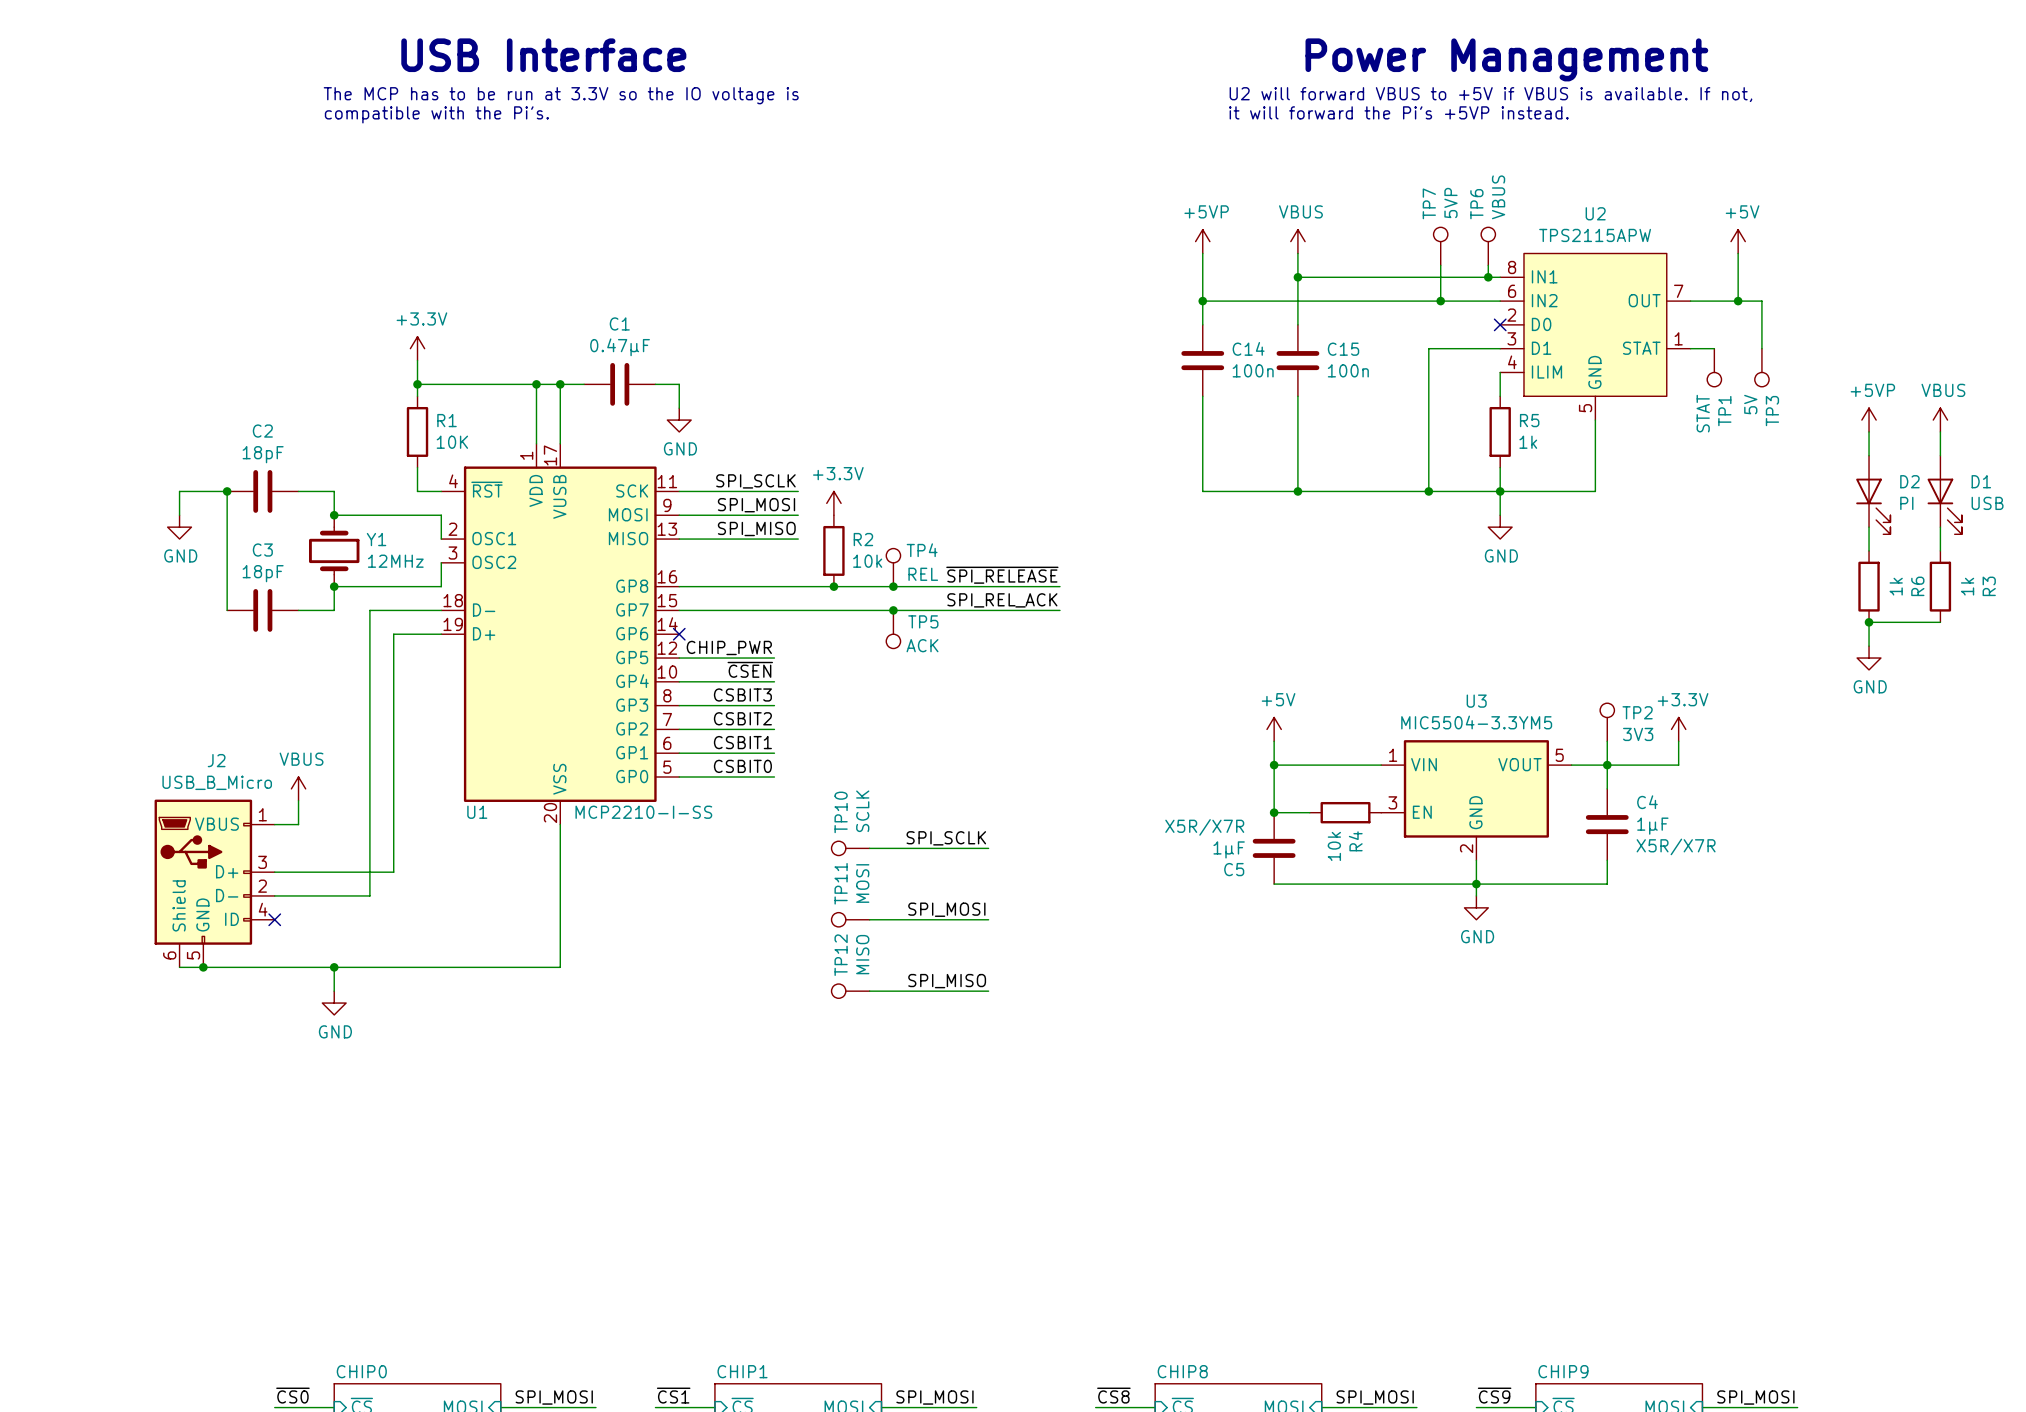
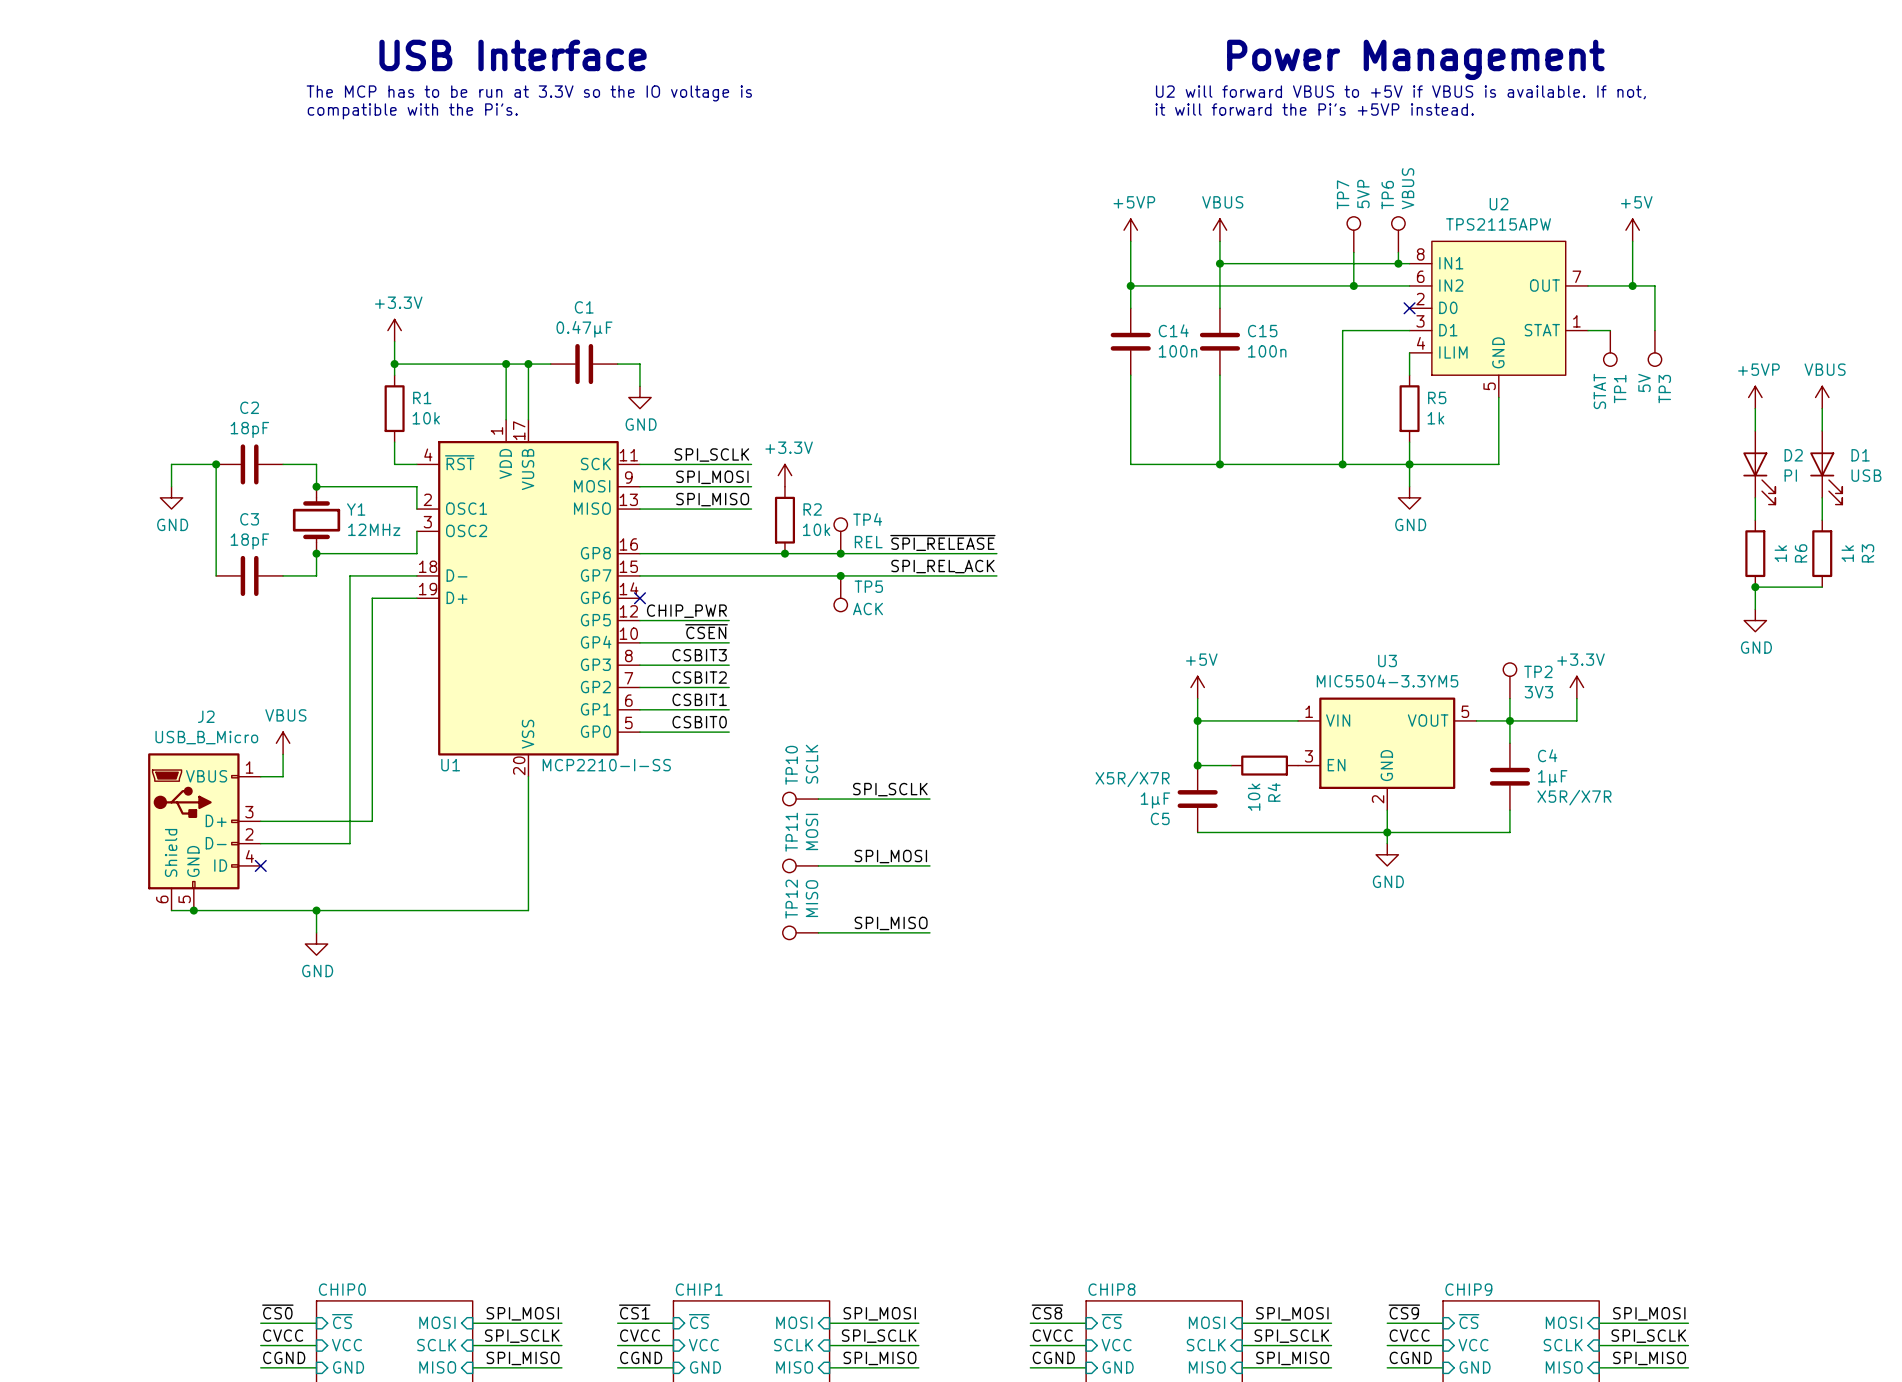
R1 value: 10K (452, 442) -> 10k (426, 418)

